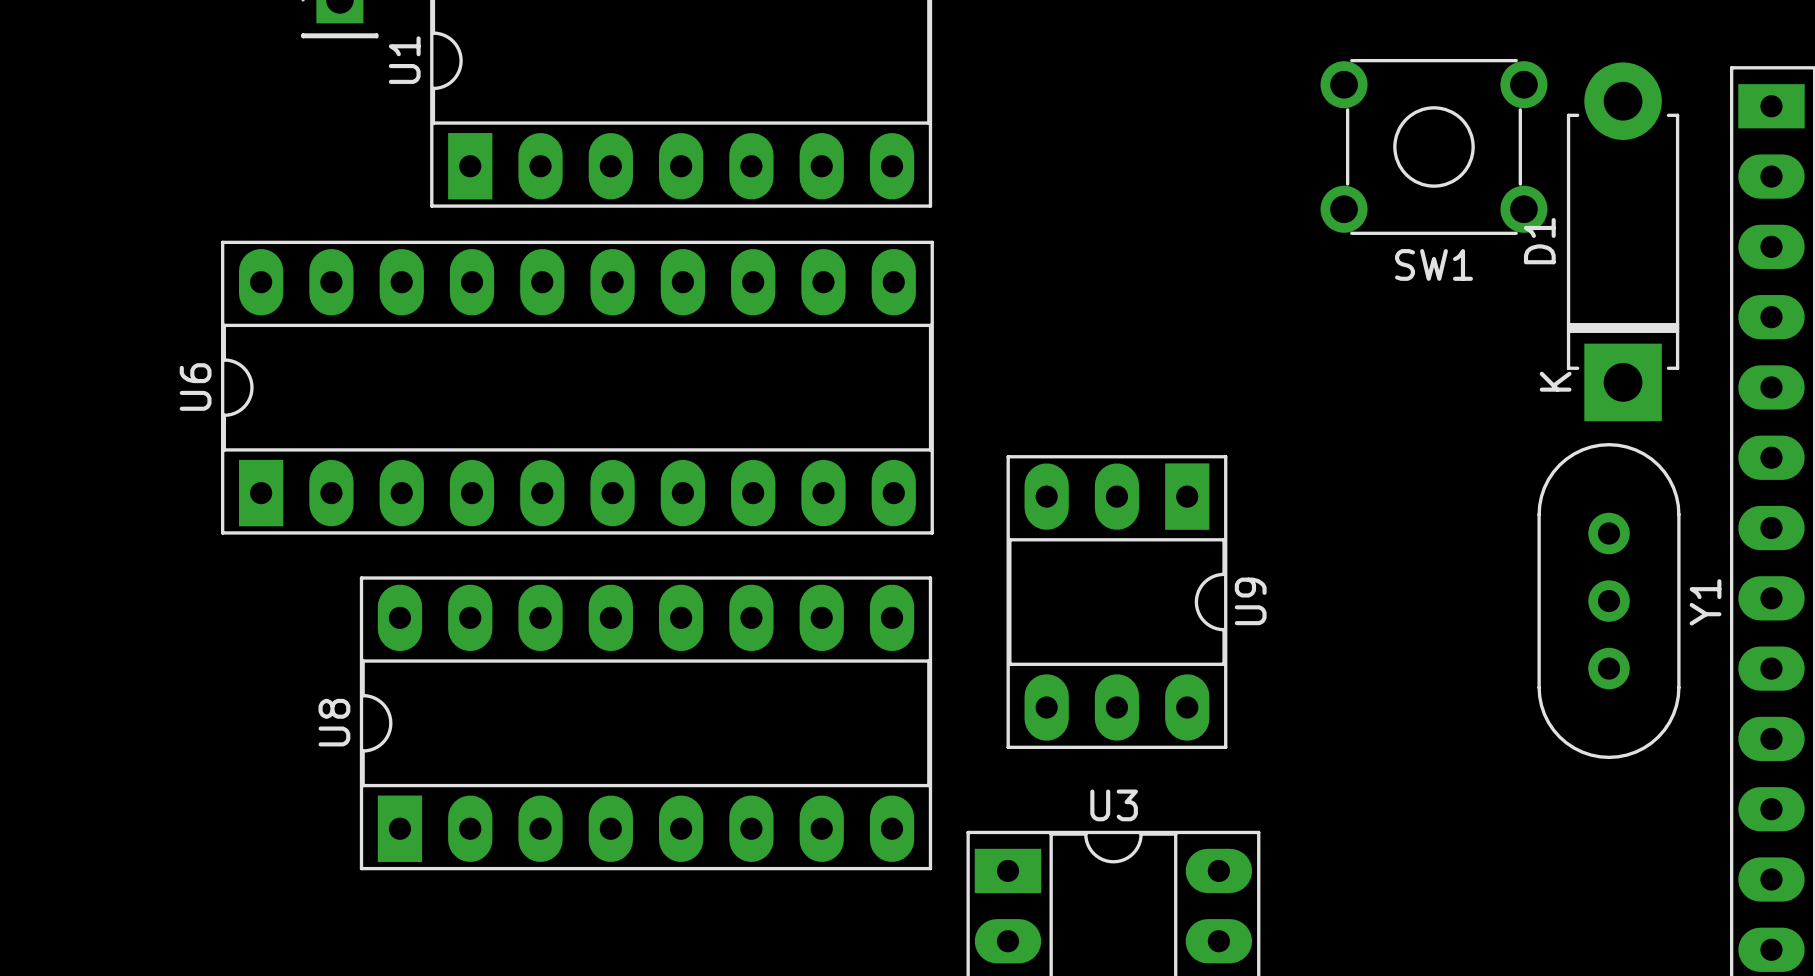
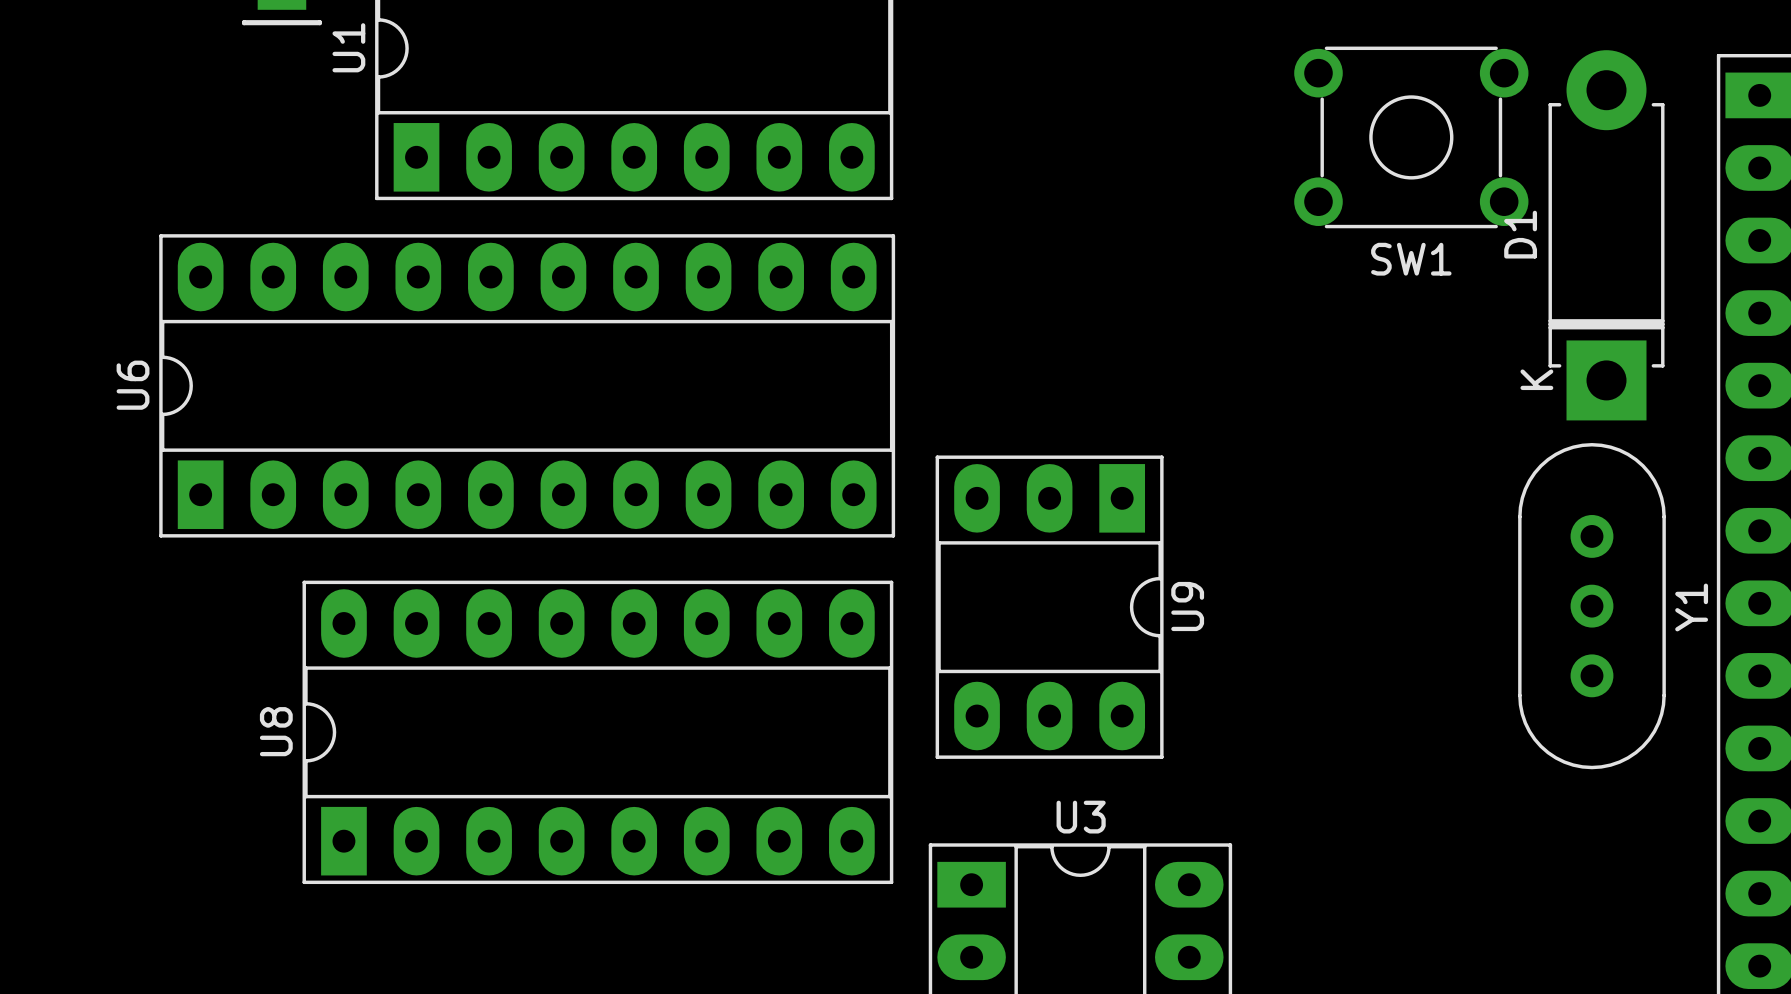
U9 position: (1116, 602) -> (1049, 607)

